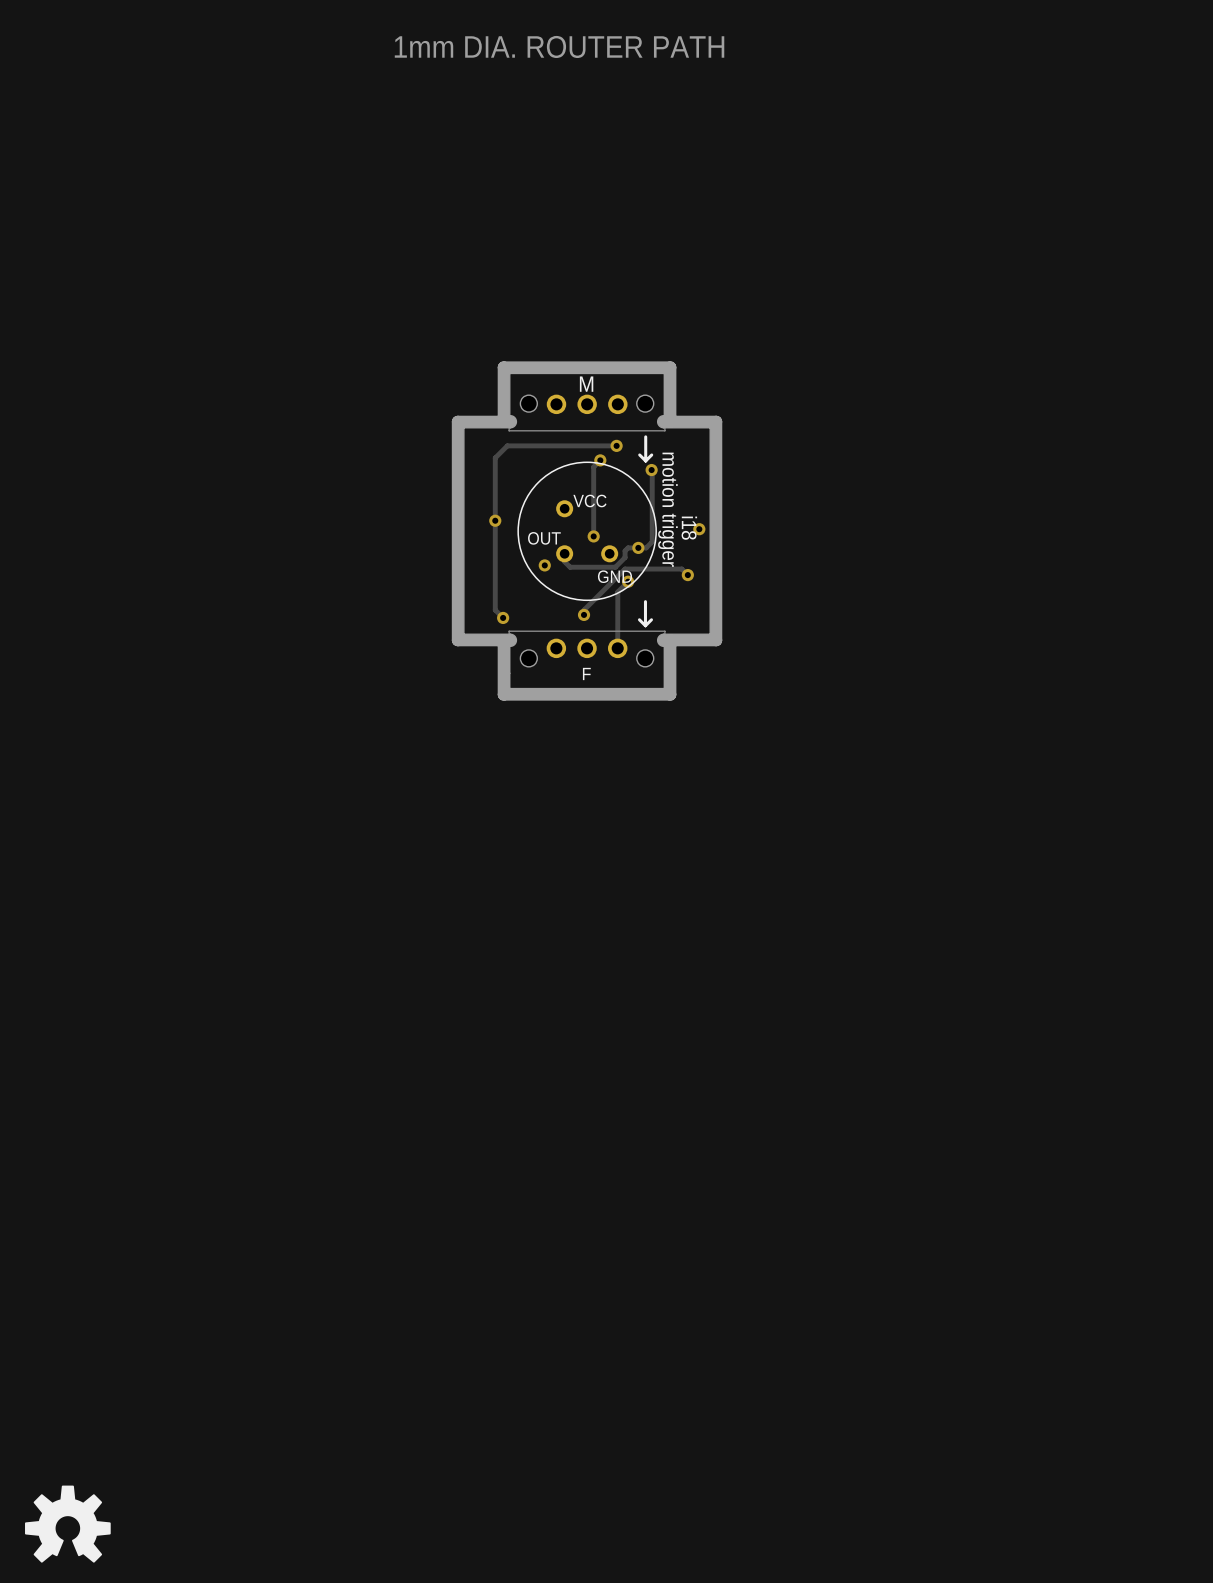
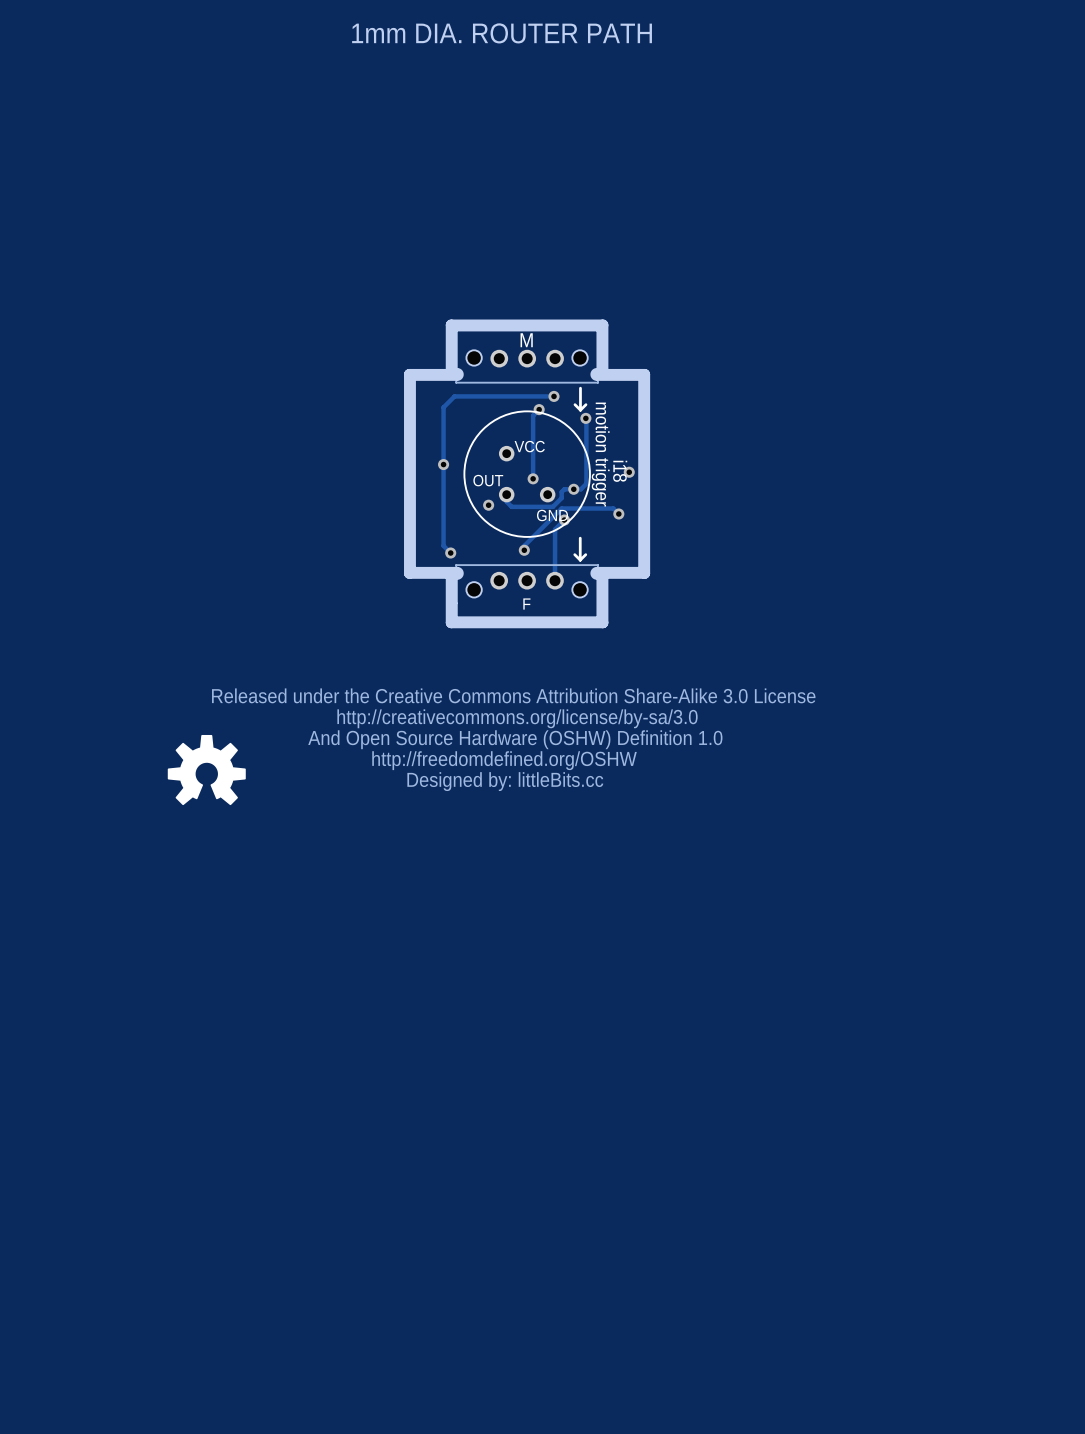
drawing: none -> [167, 734, 246, 806]
drawing: [25, 1485, 111, 1563] -> none

